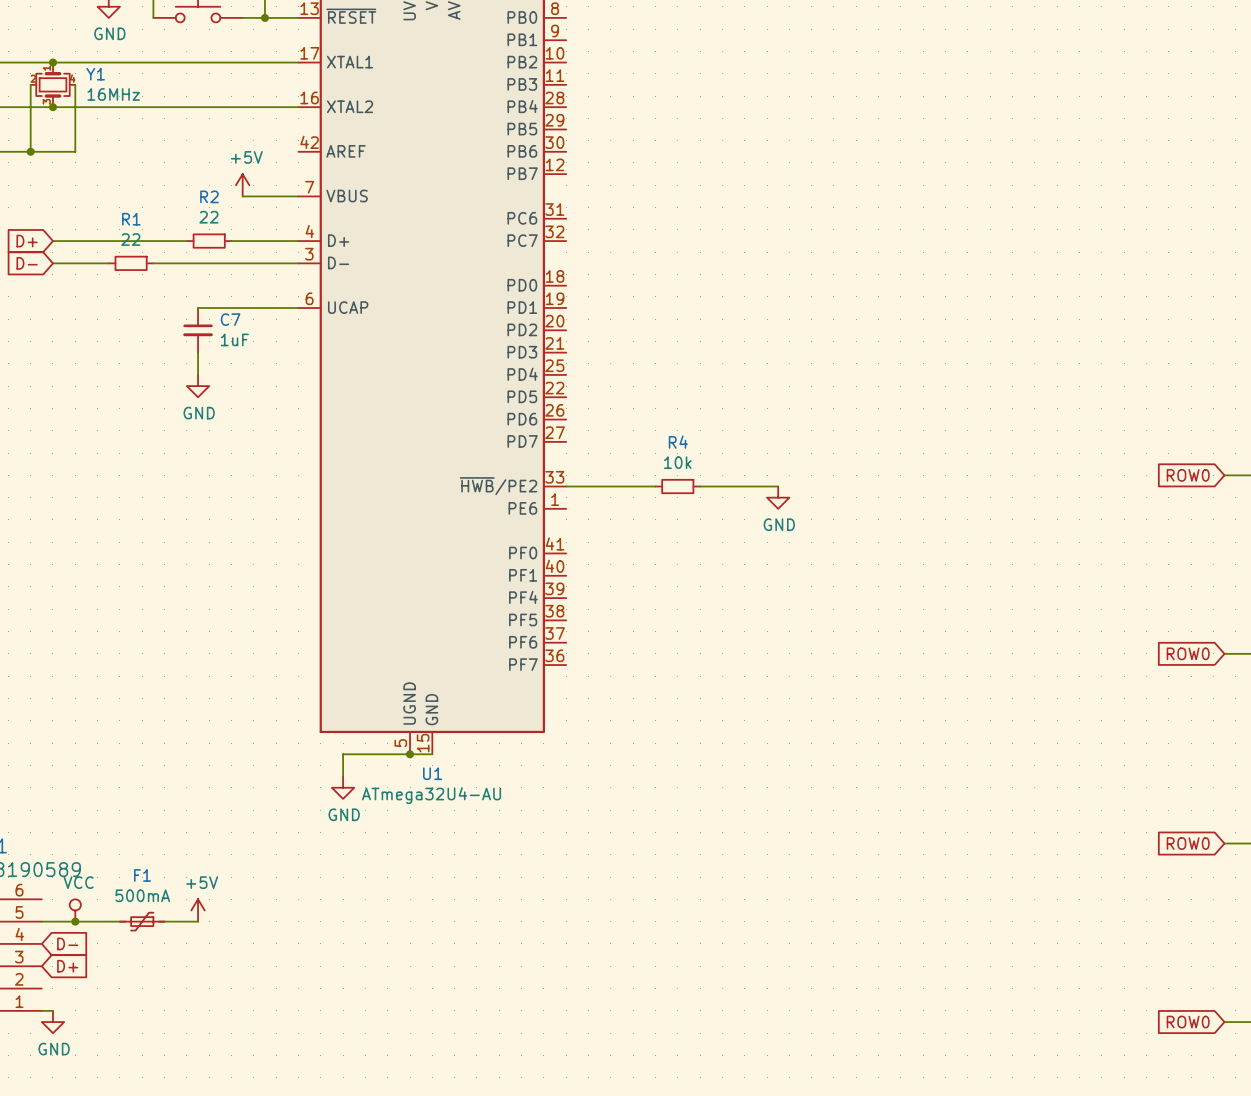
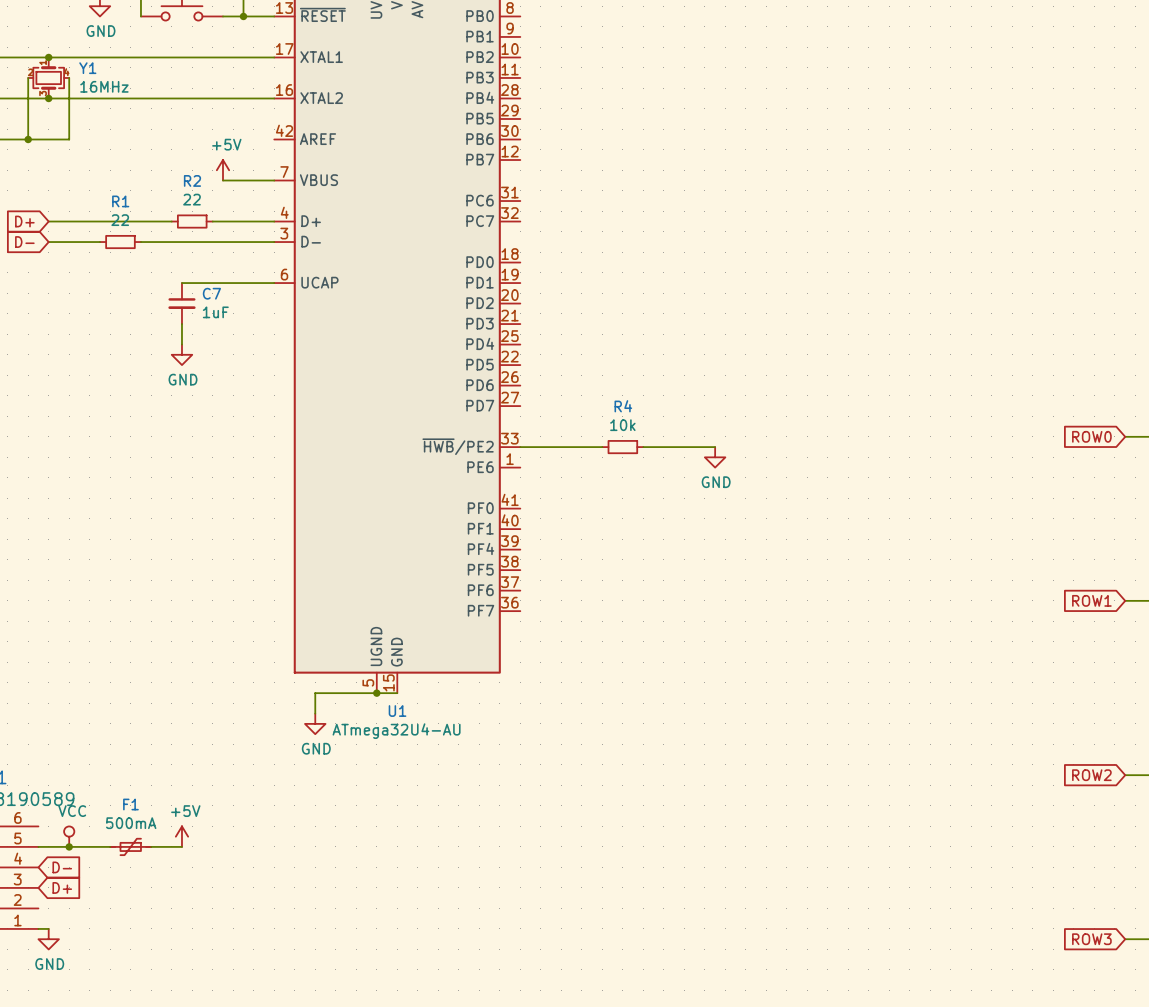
global label: ROW0 (1188, 653) -> ROW1 (1091, 600)
global label: ROW0 (1188, 843) -> ROW2 (1091, 775)
global label: ROW0 (1188, 1022) -> ROW3 (1091, 939)

